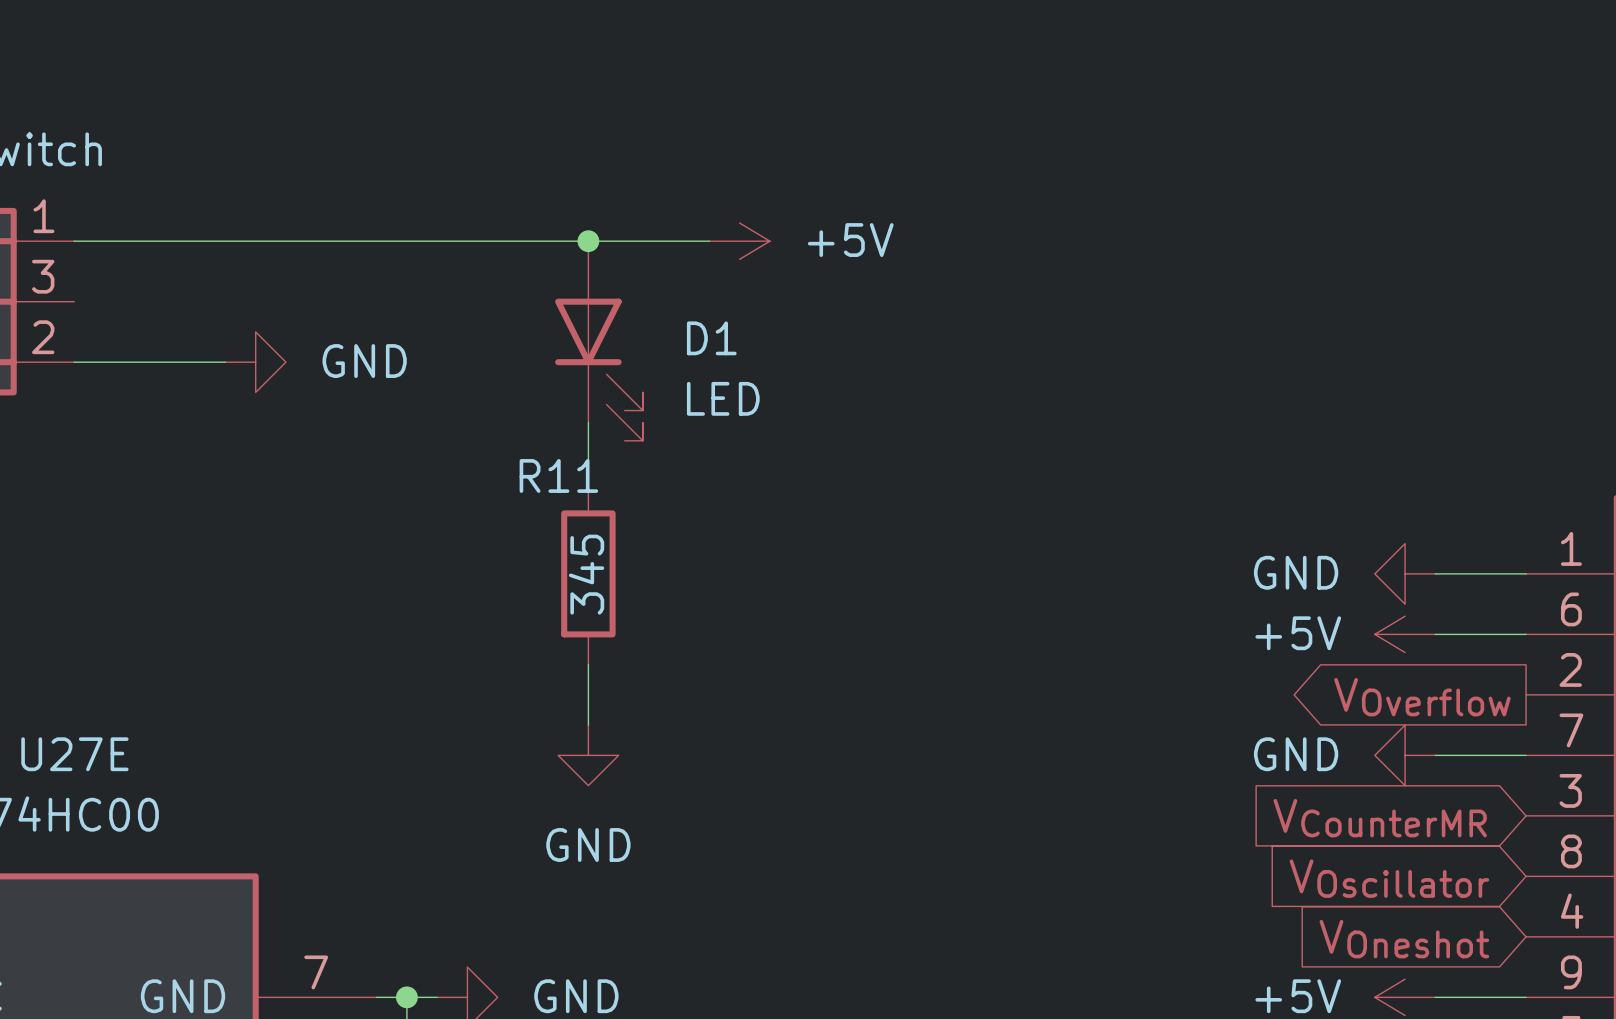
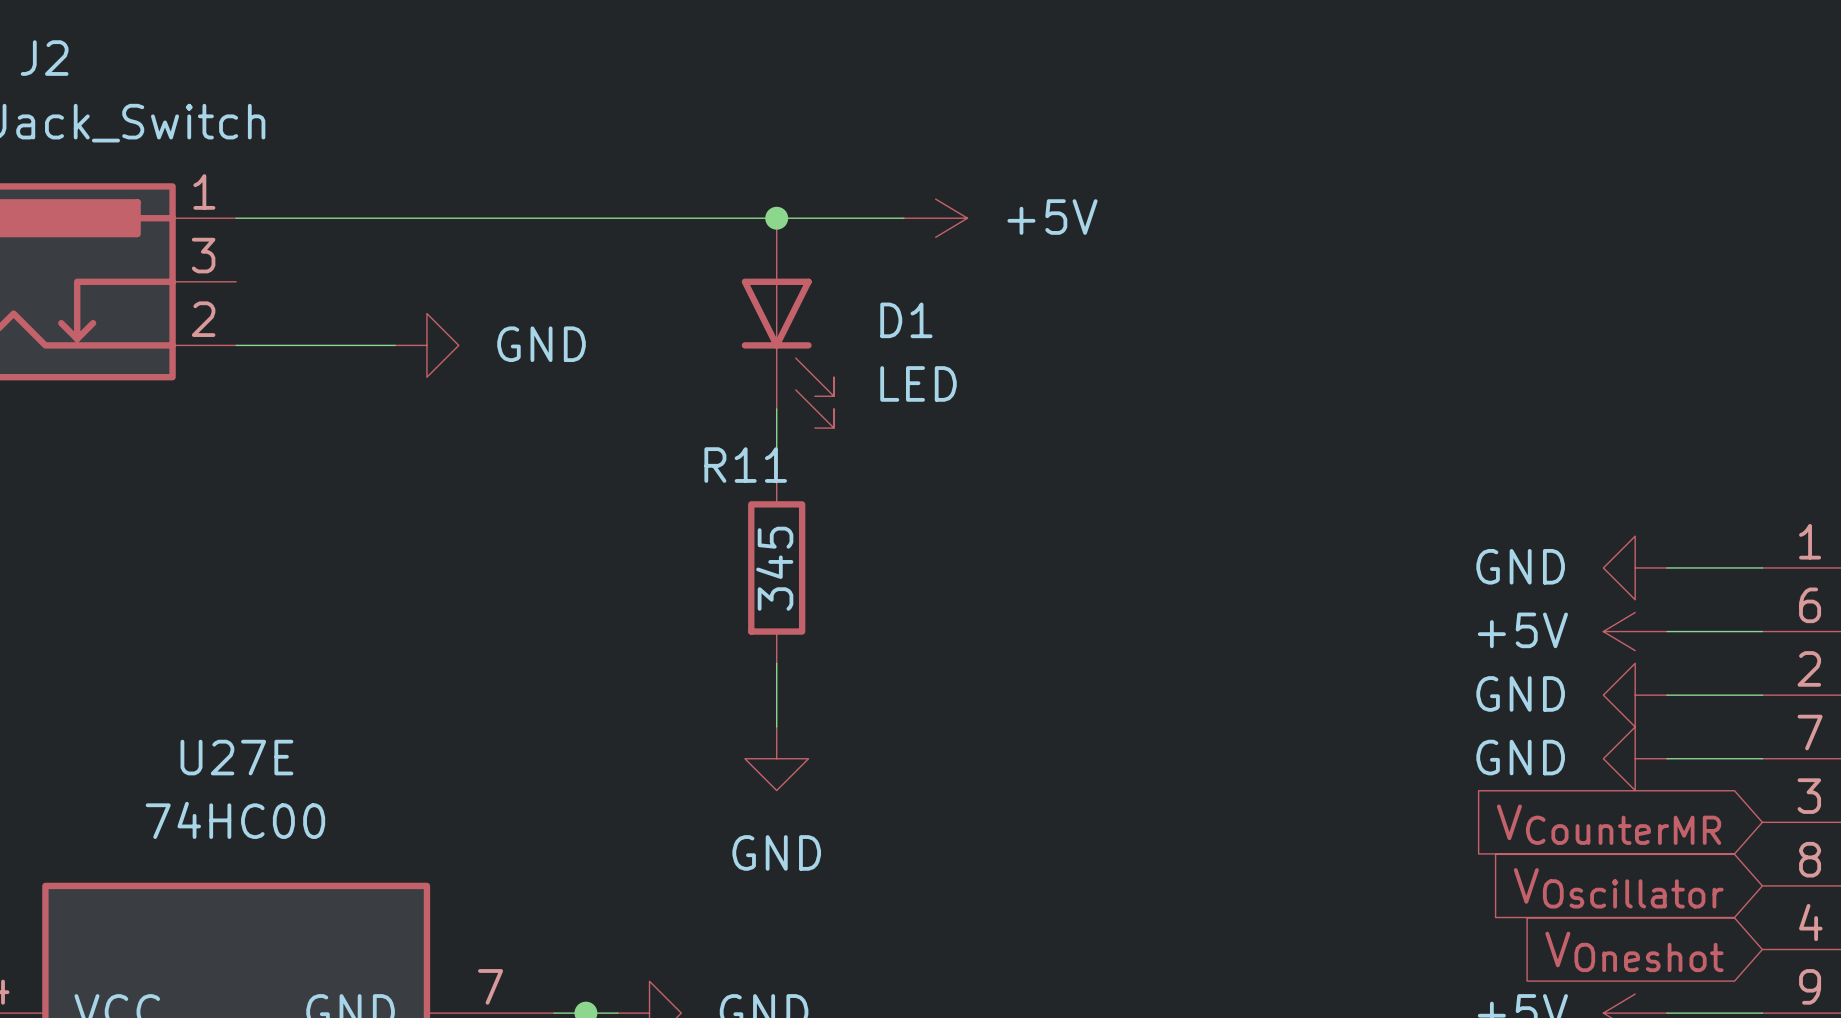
power symbol: none -> GND (1635, 695)
wire: none -> (1666, 695) (1762, 695)
global label: VOverflow (1422, 697) -> none

